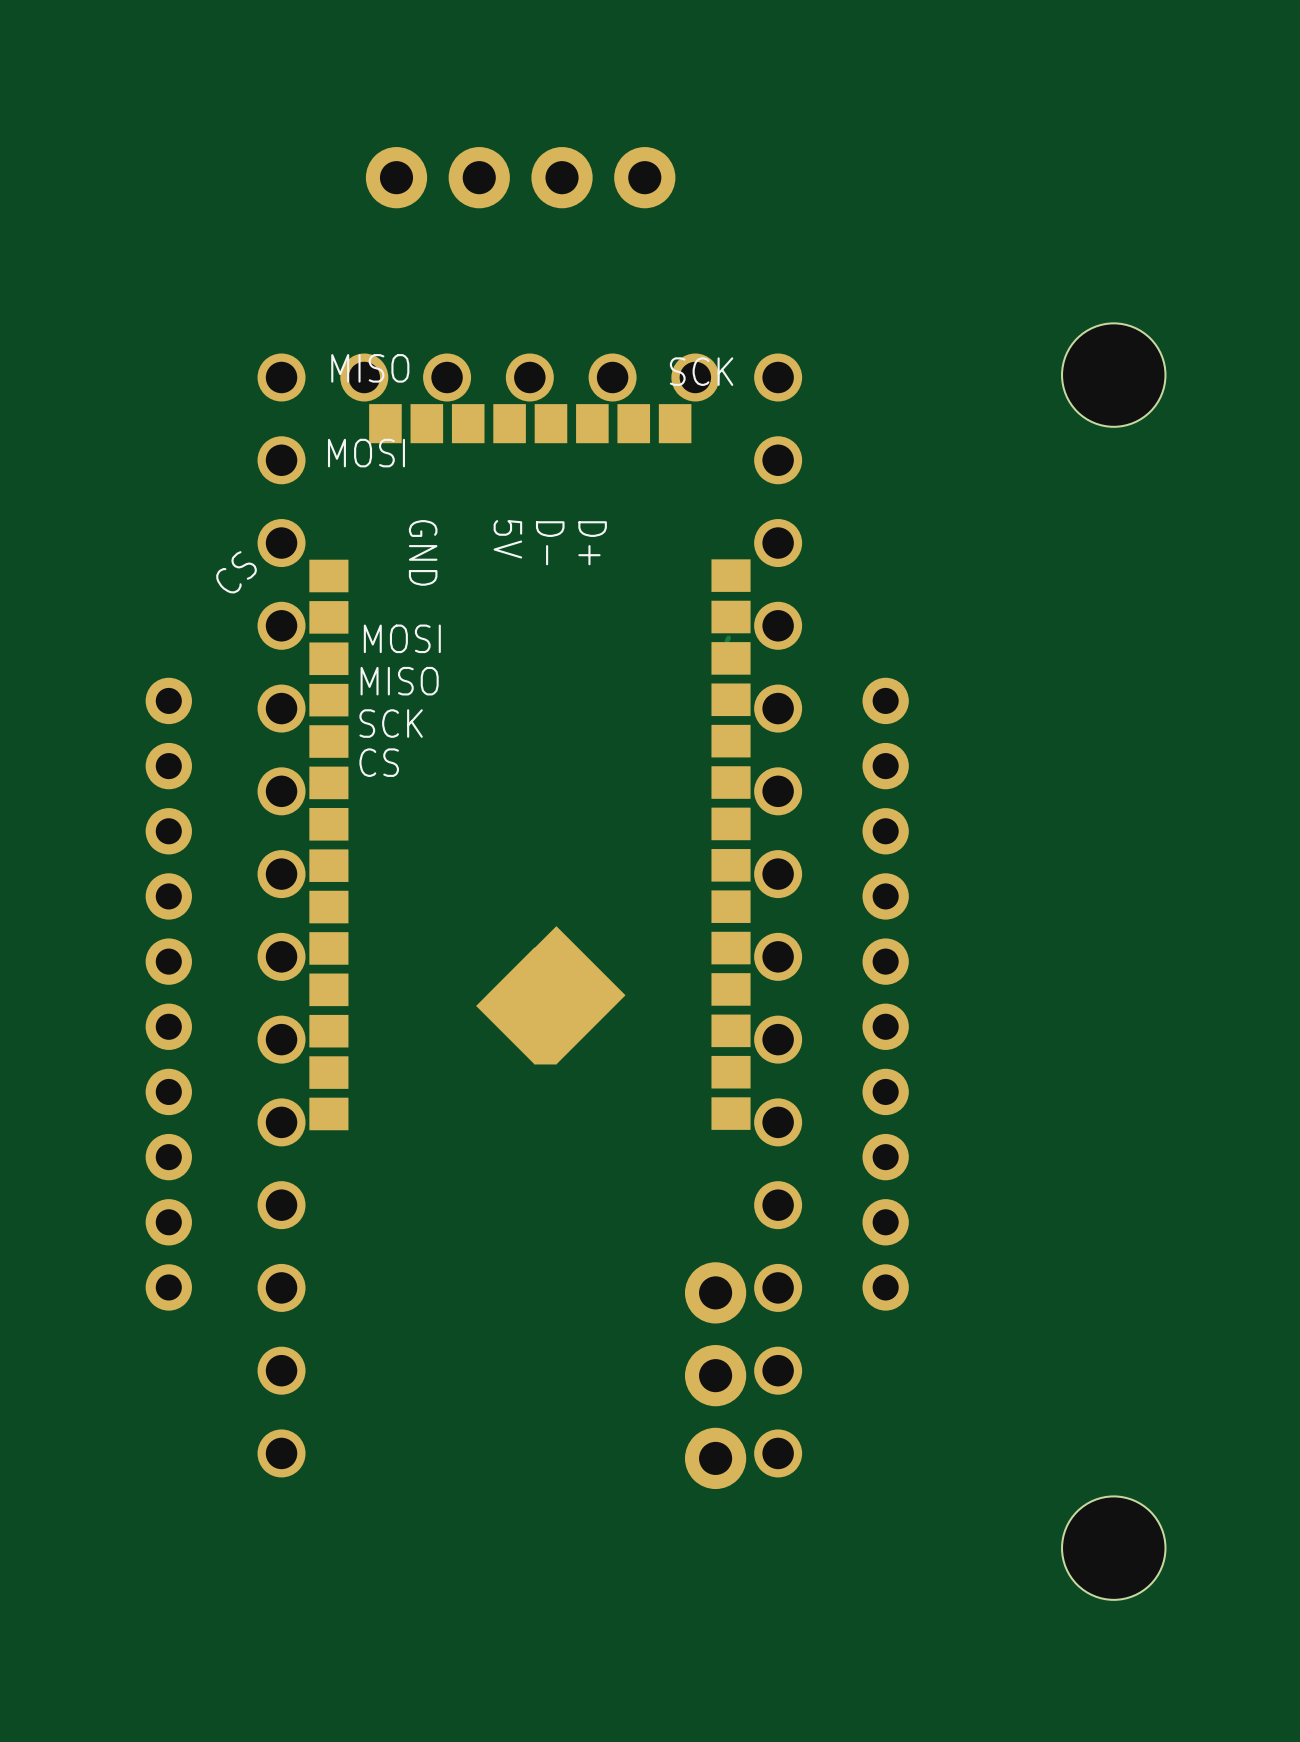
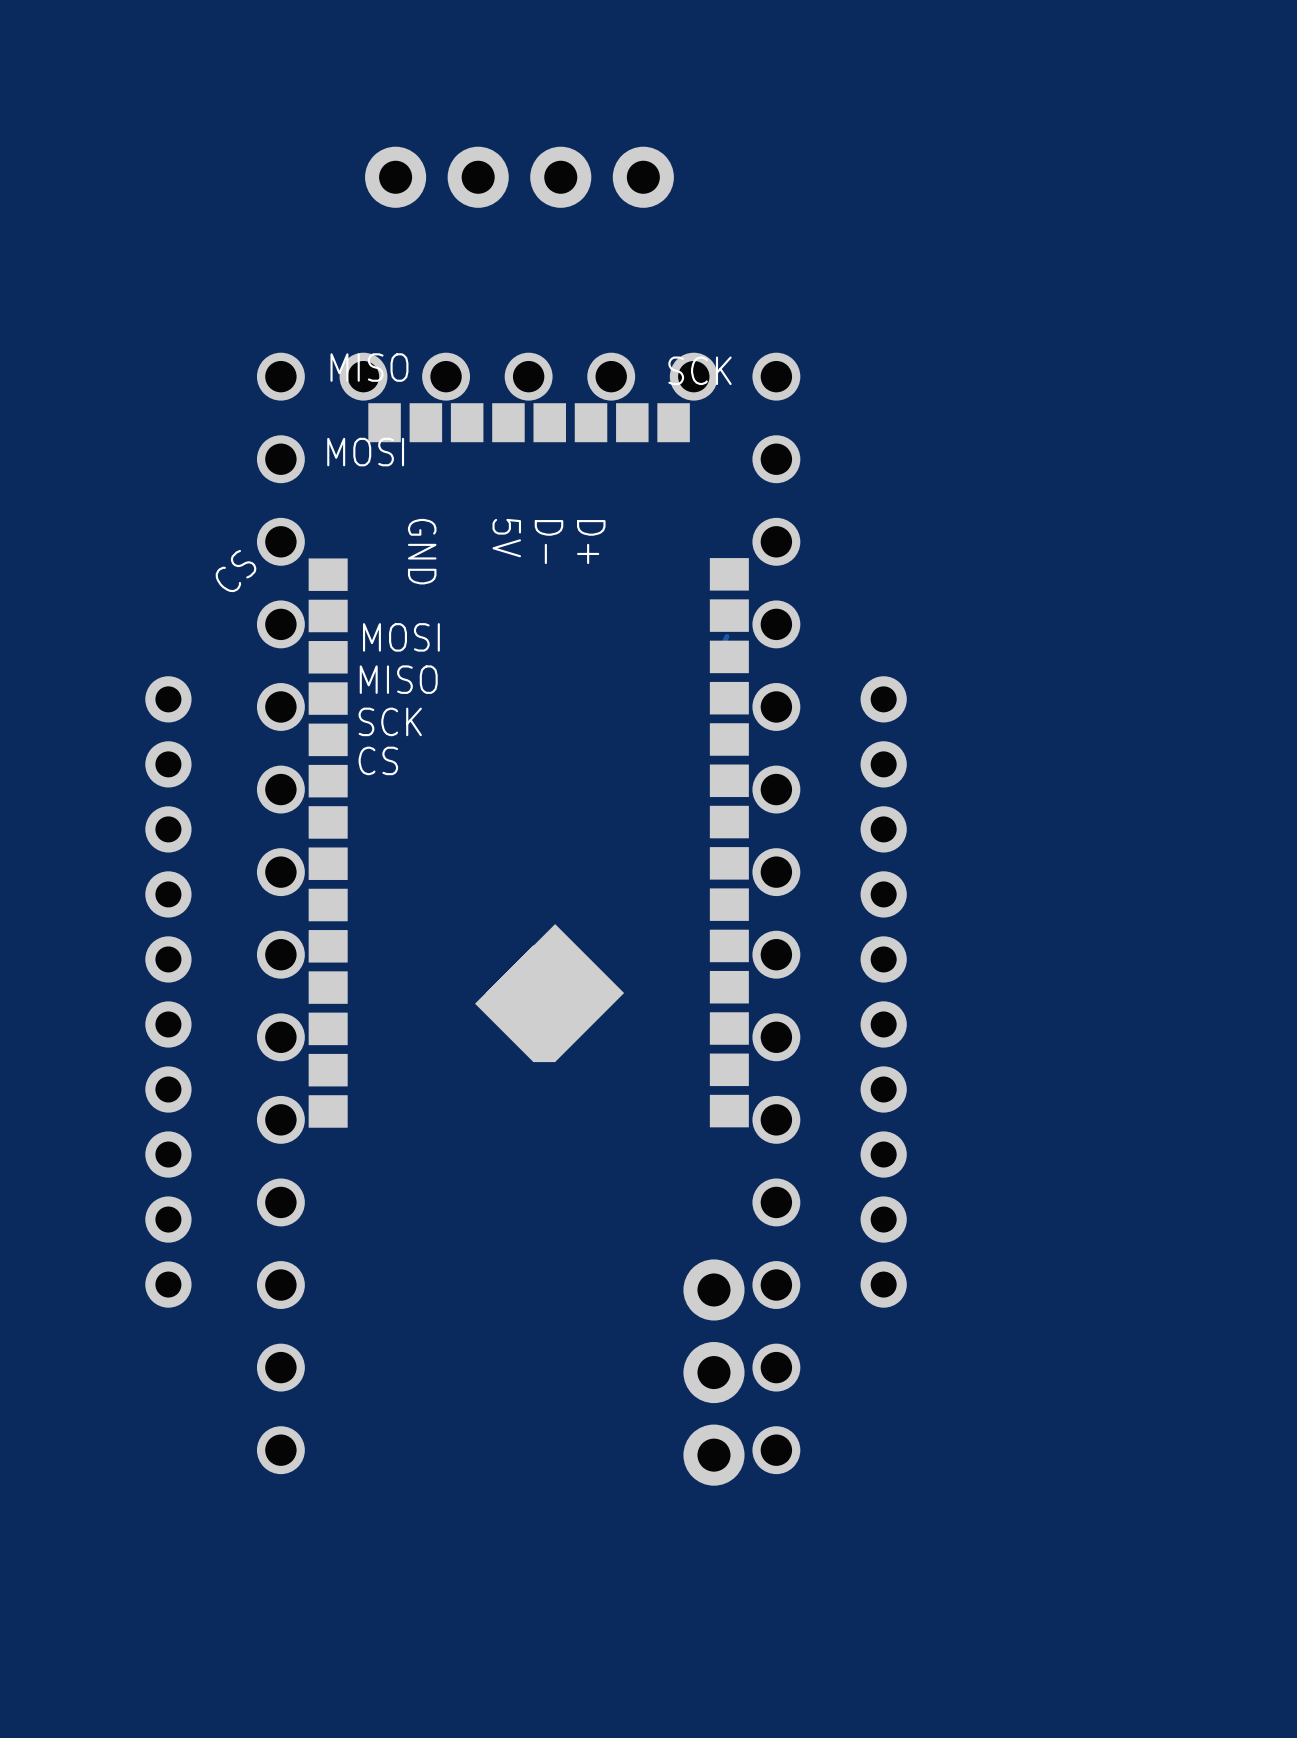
hole: (1113, 375) -> none
hole: (1113, 1548) -> none

